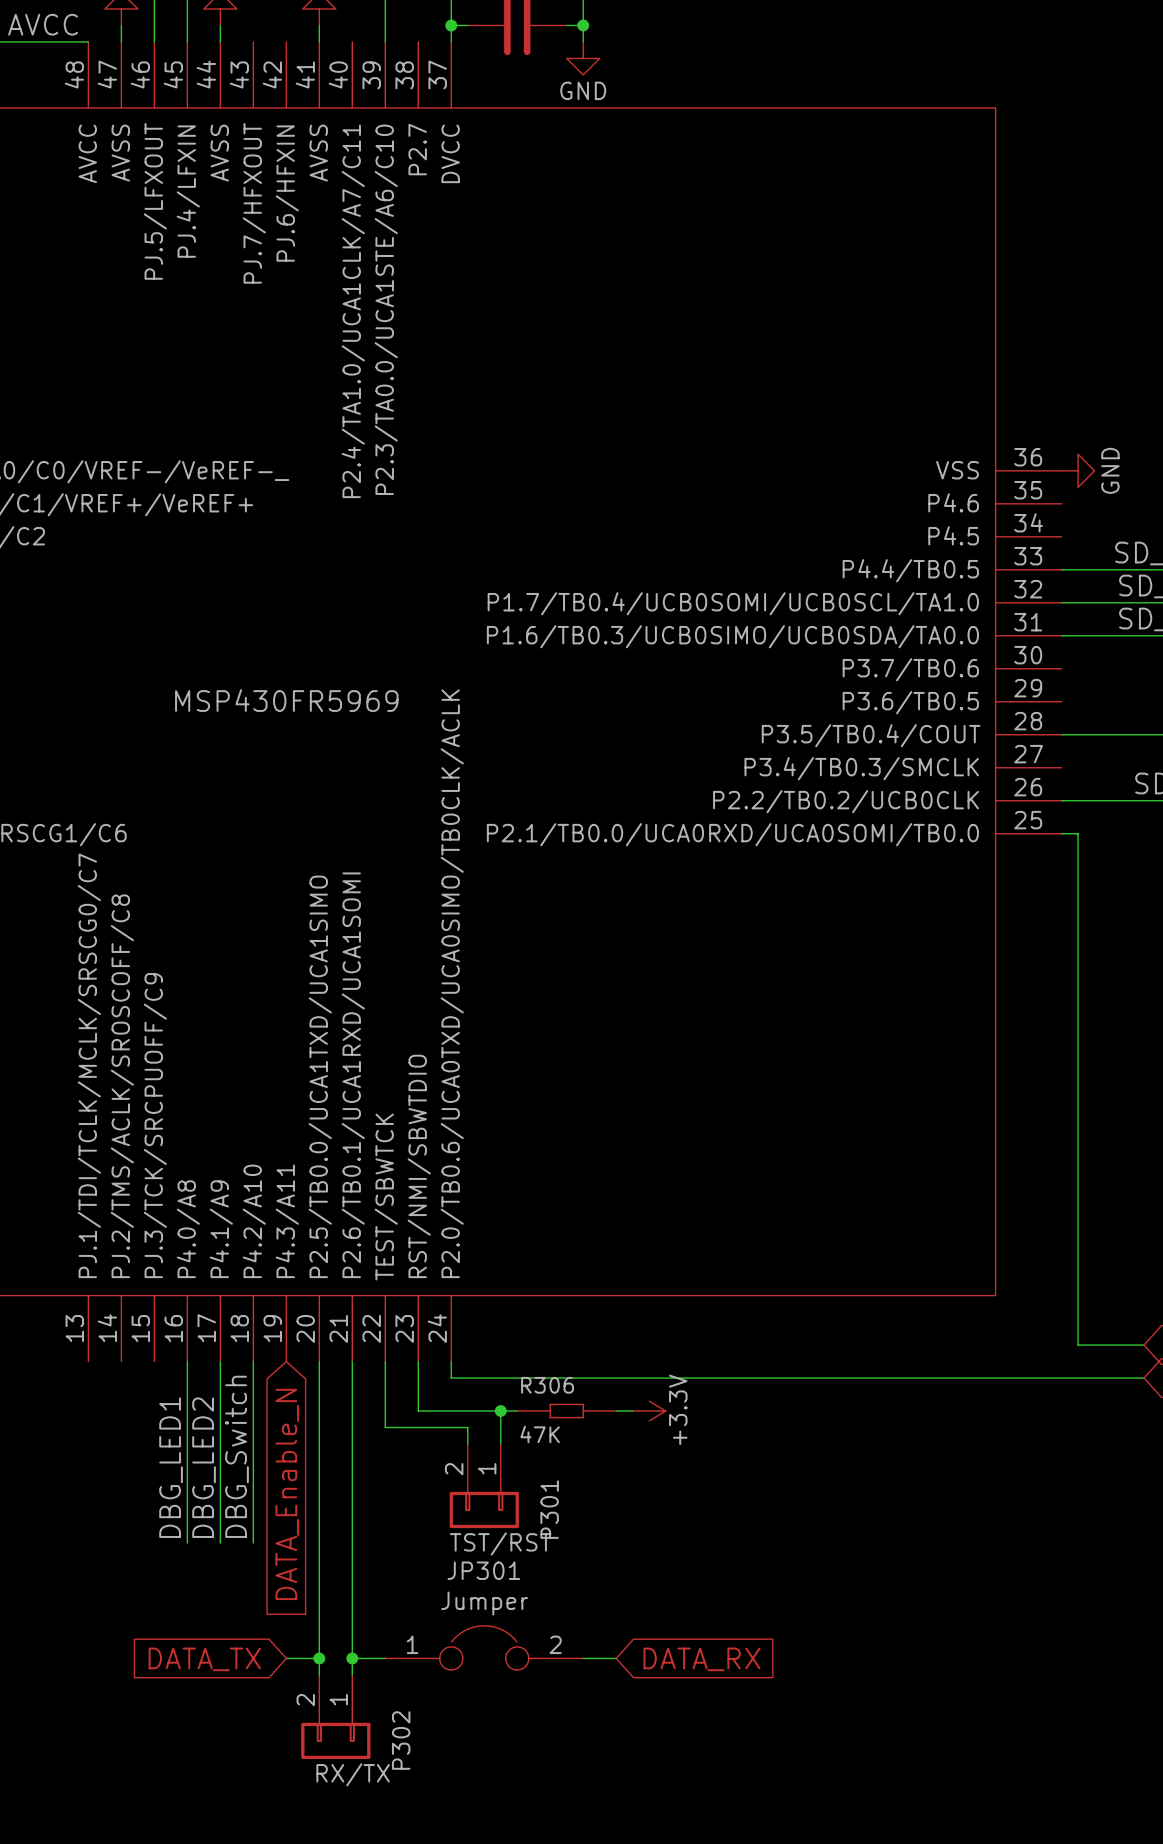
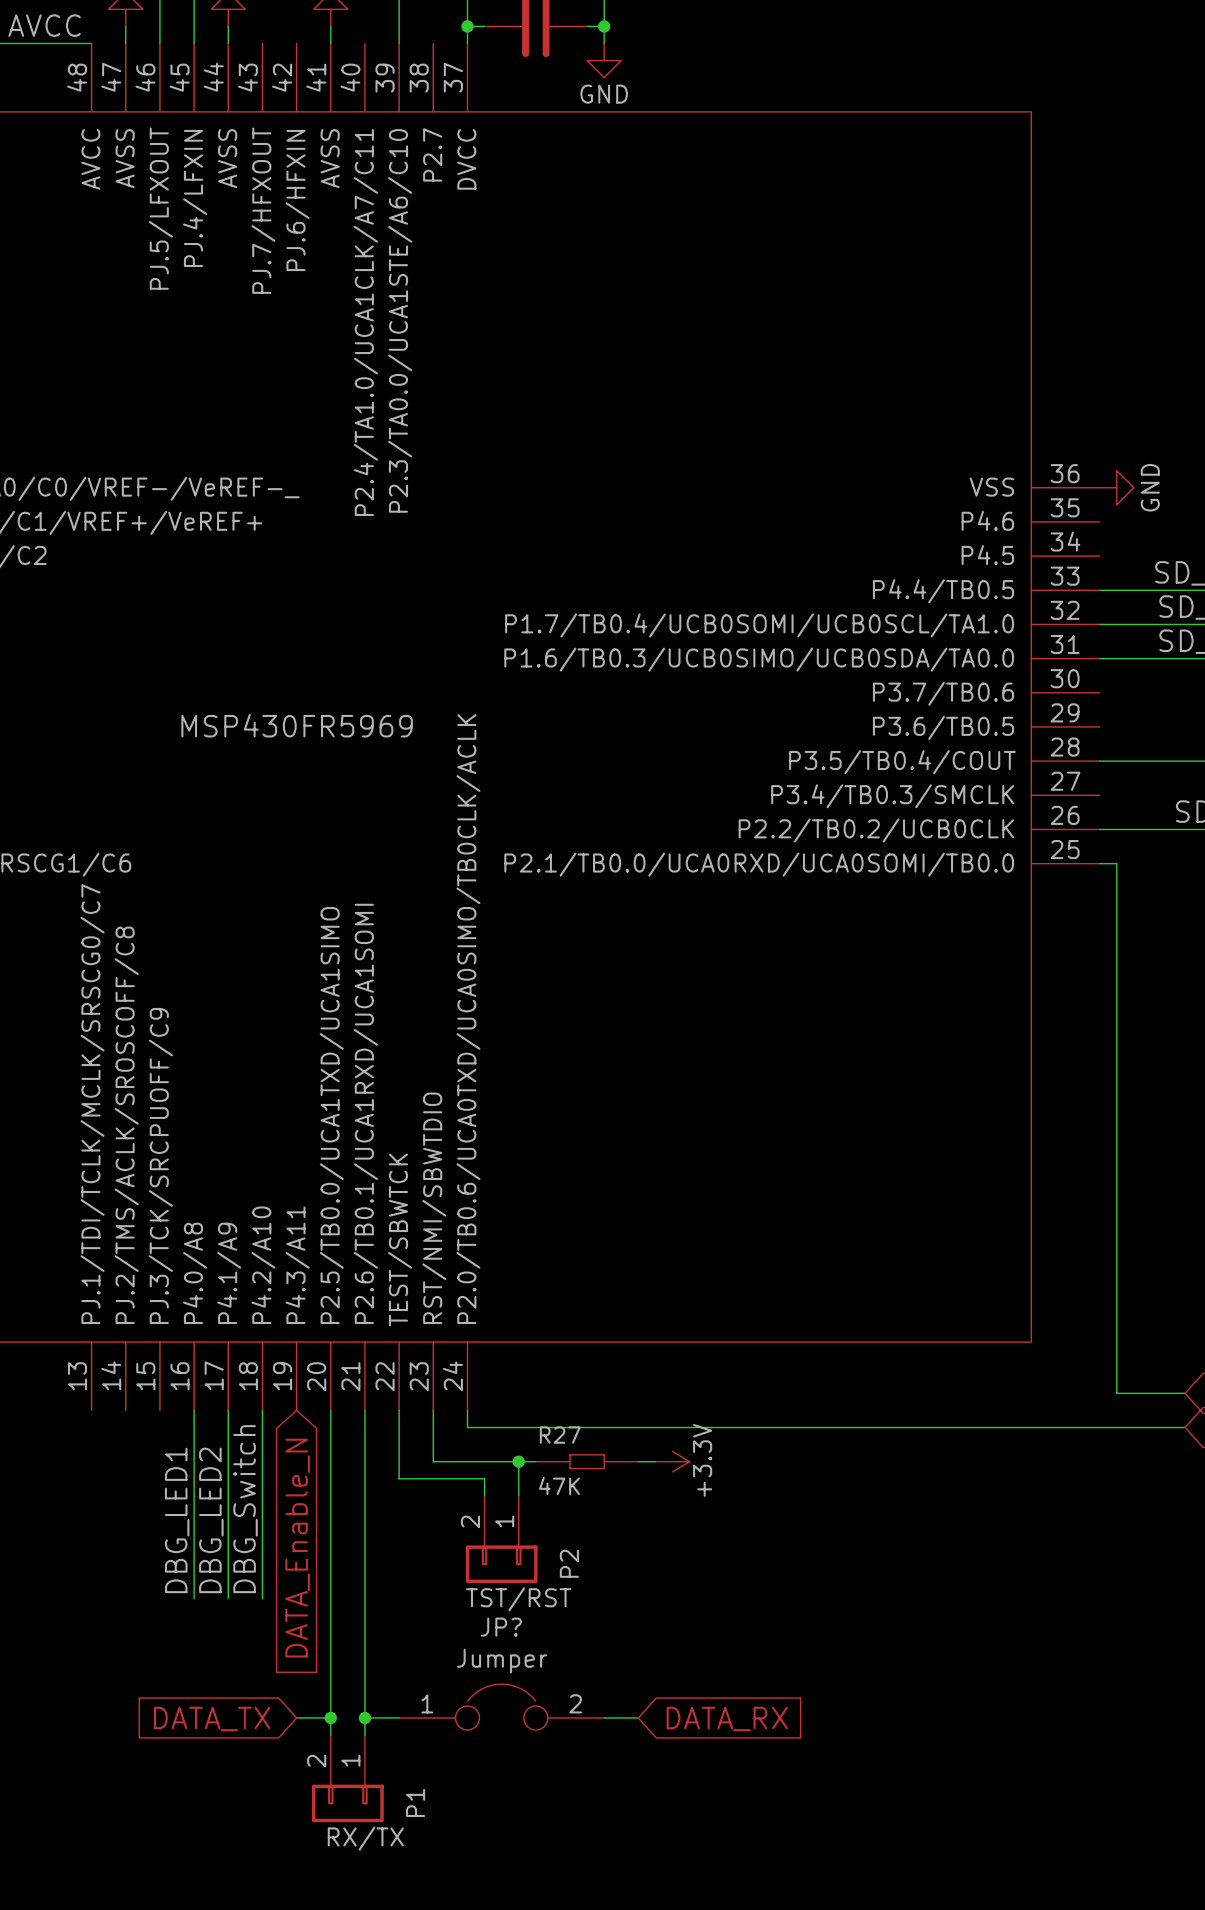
R306 name: R306 (547, 1385) -> R27 (560, 1435)
P301 name: P301 (549, 1509) -> P2 (569, 1563)
JP301 name: JP301 (483, 1570) -> JP? (501, 1627)
P302 name: P302 (401, 1740) -> P1 (415, 1803)

